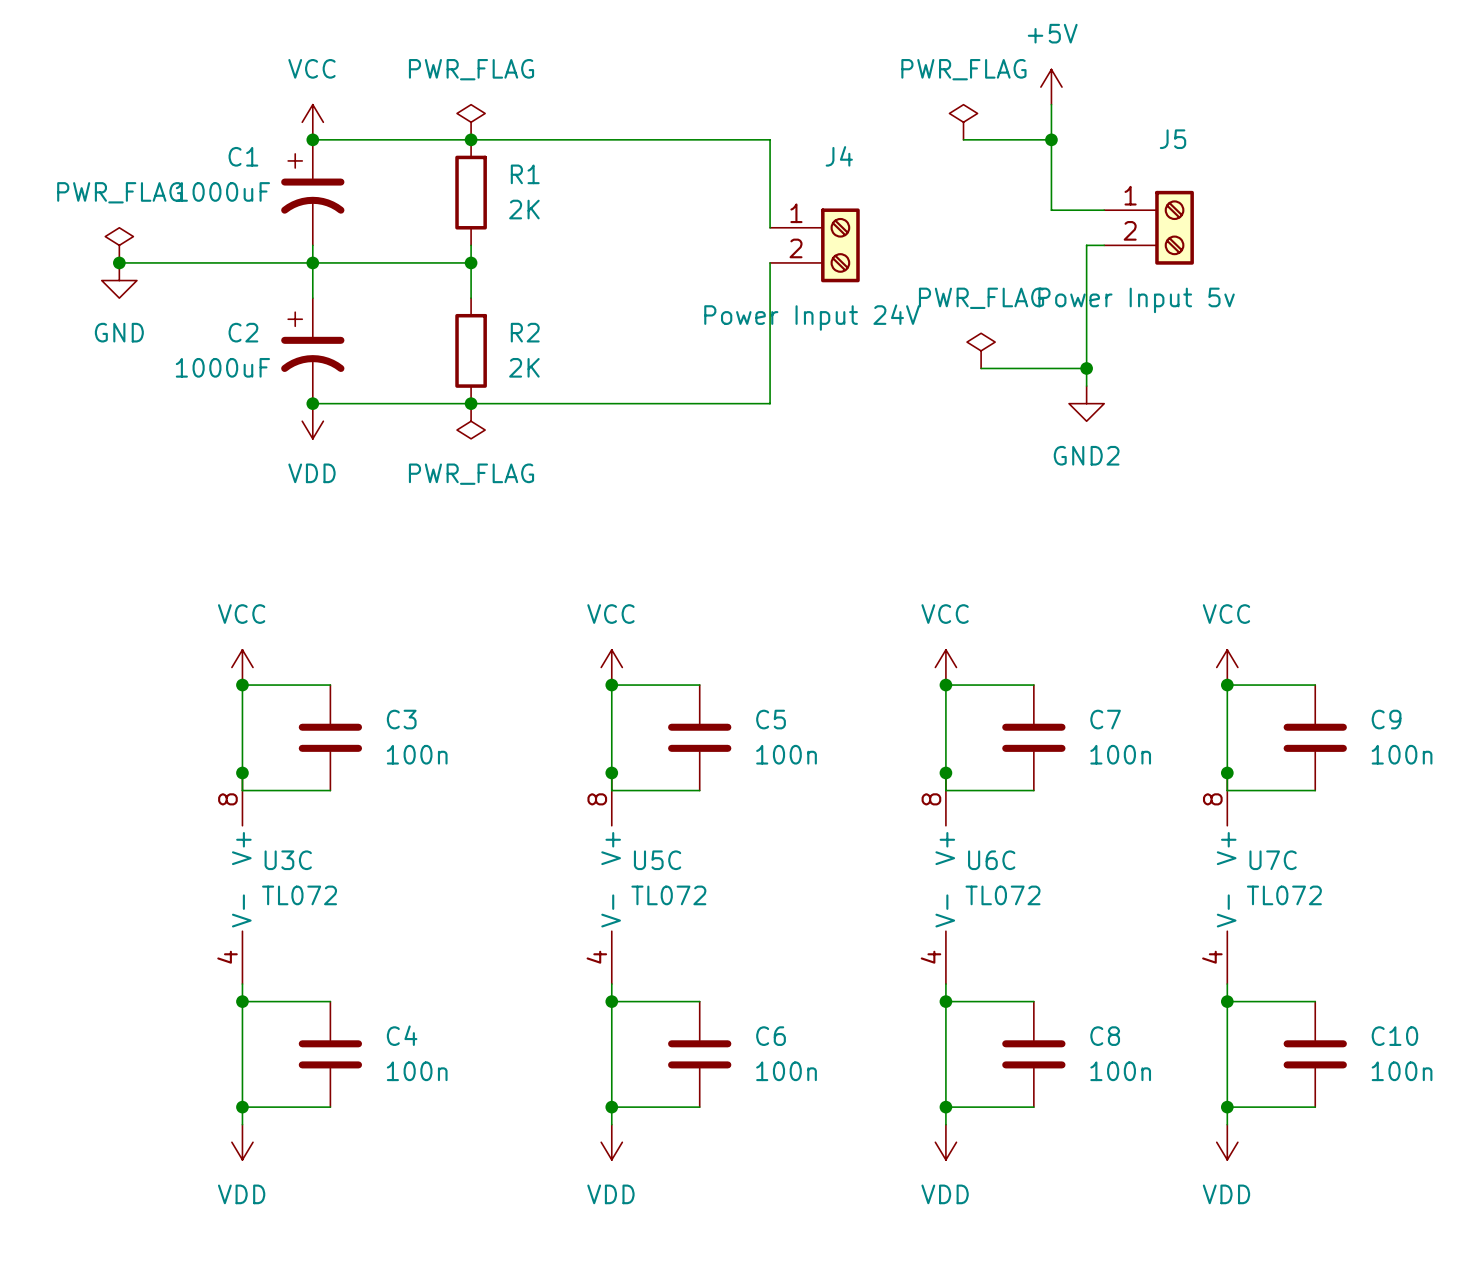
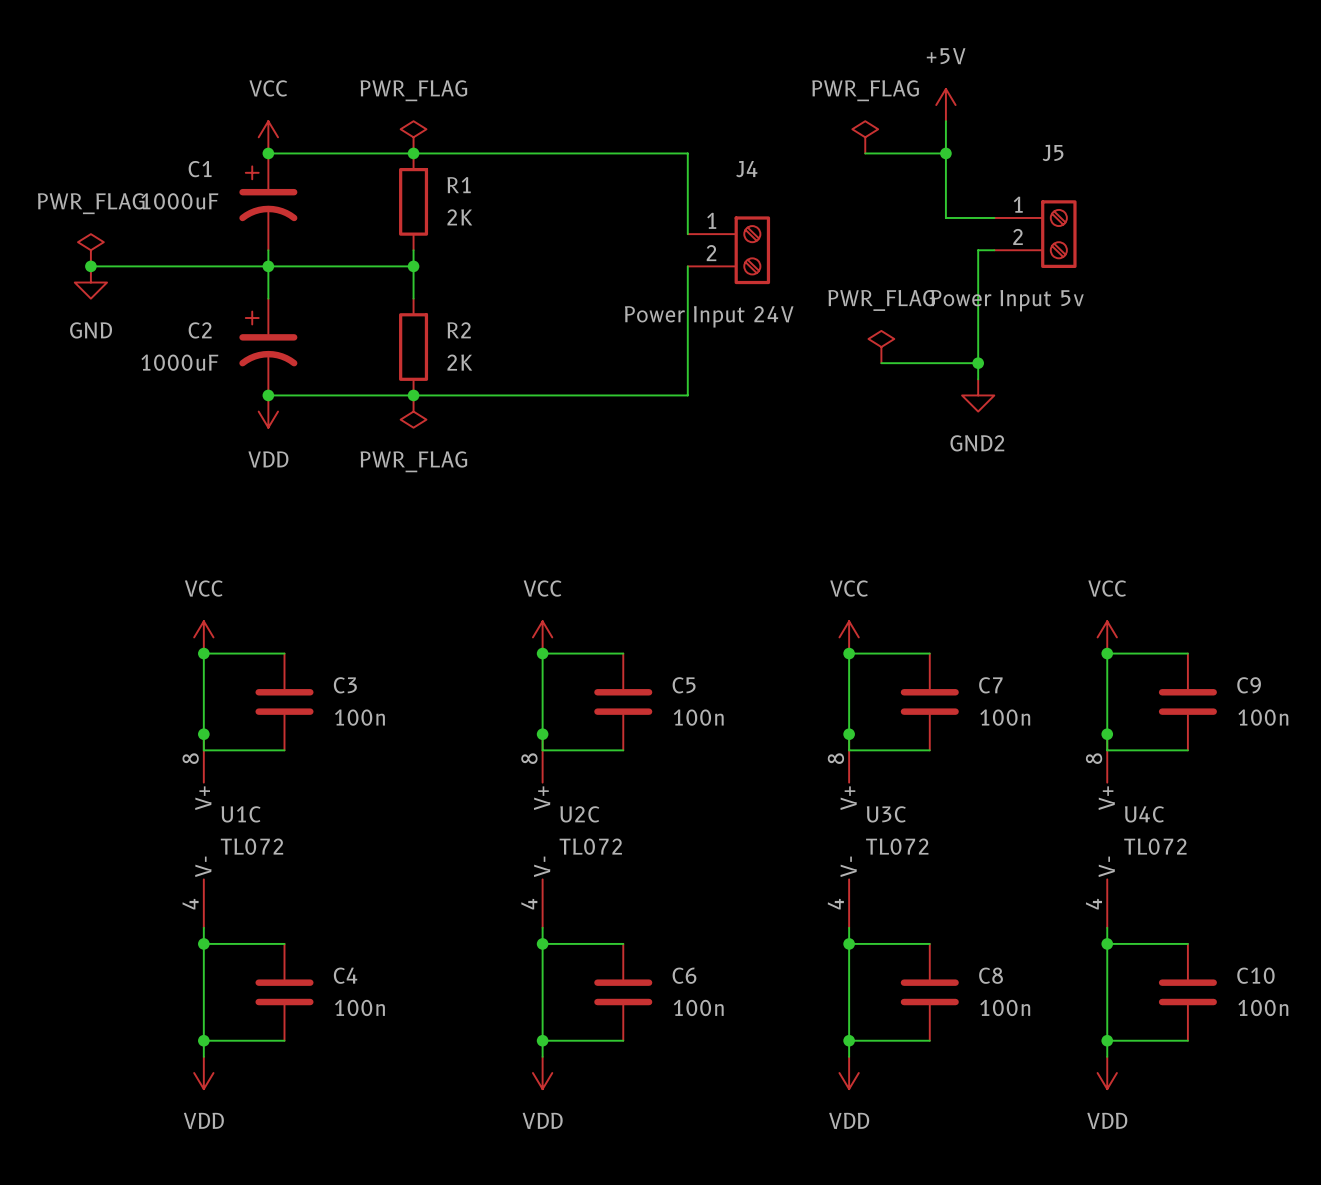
U3C name: U3C (288, 860) -> U1C (241, 814)
U5C name: U5C (657, 860) -> U2C (579, 814)
U6C name: U6C (991, 860) -> U3C (886, 814)
U7C name: U7C (1273, 860) -> U4C (1144, 814)

